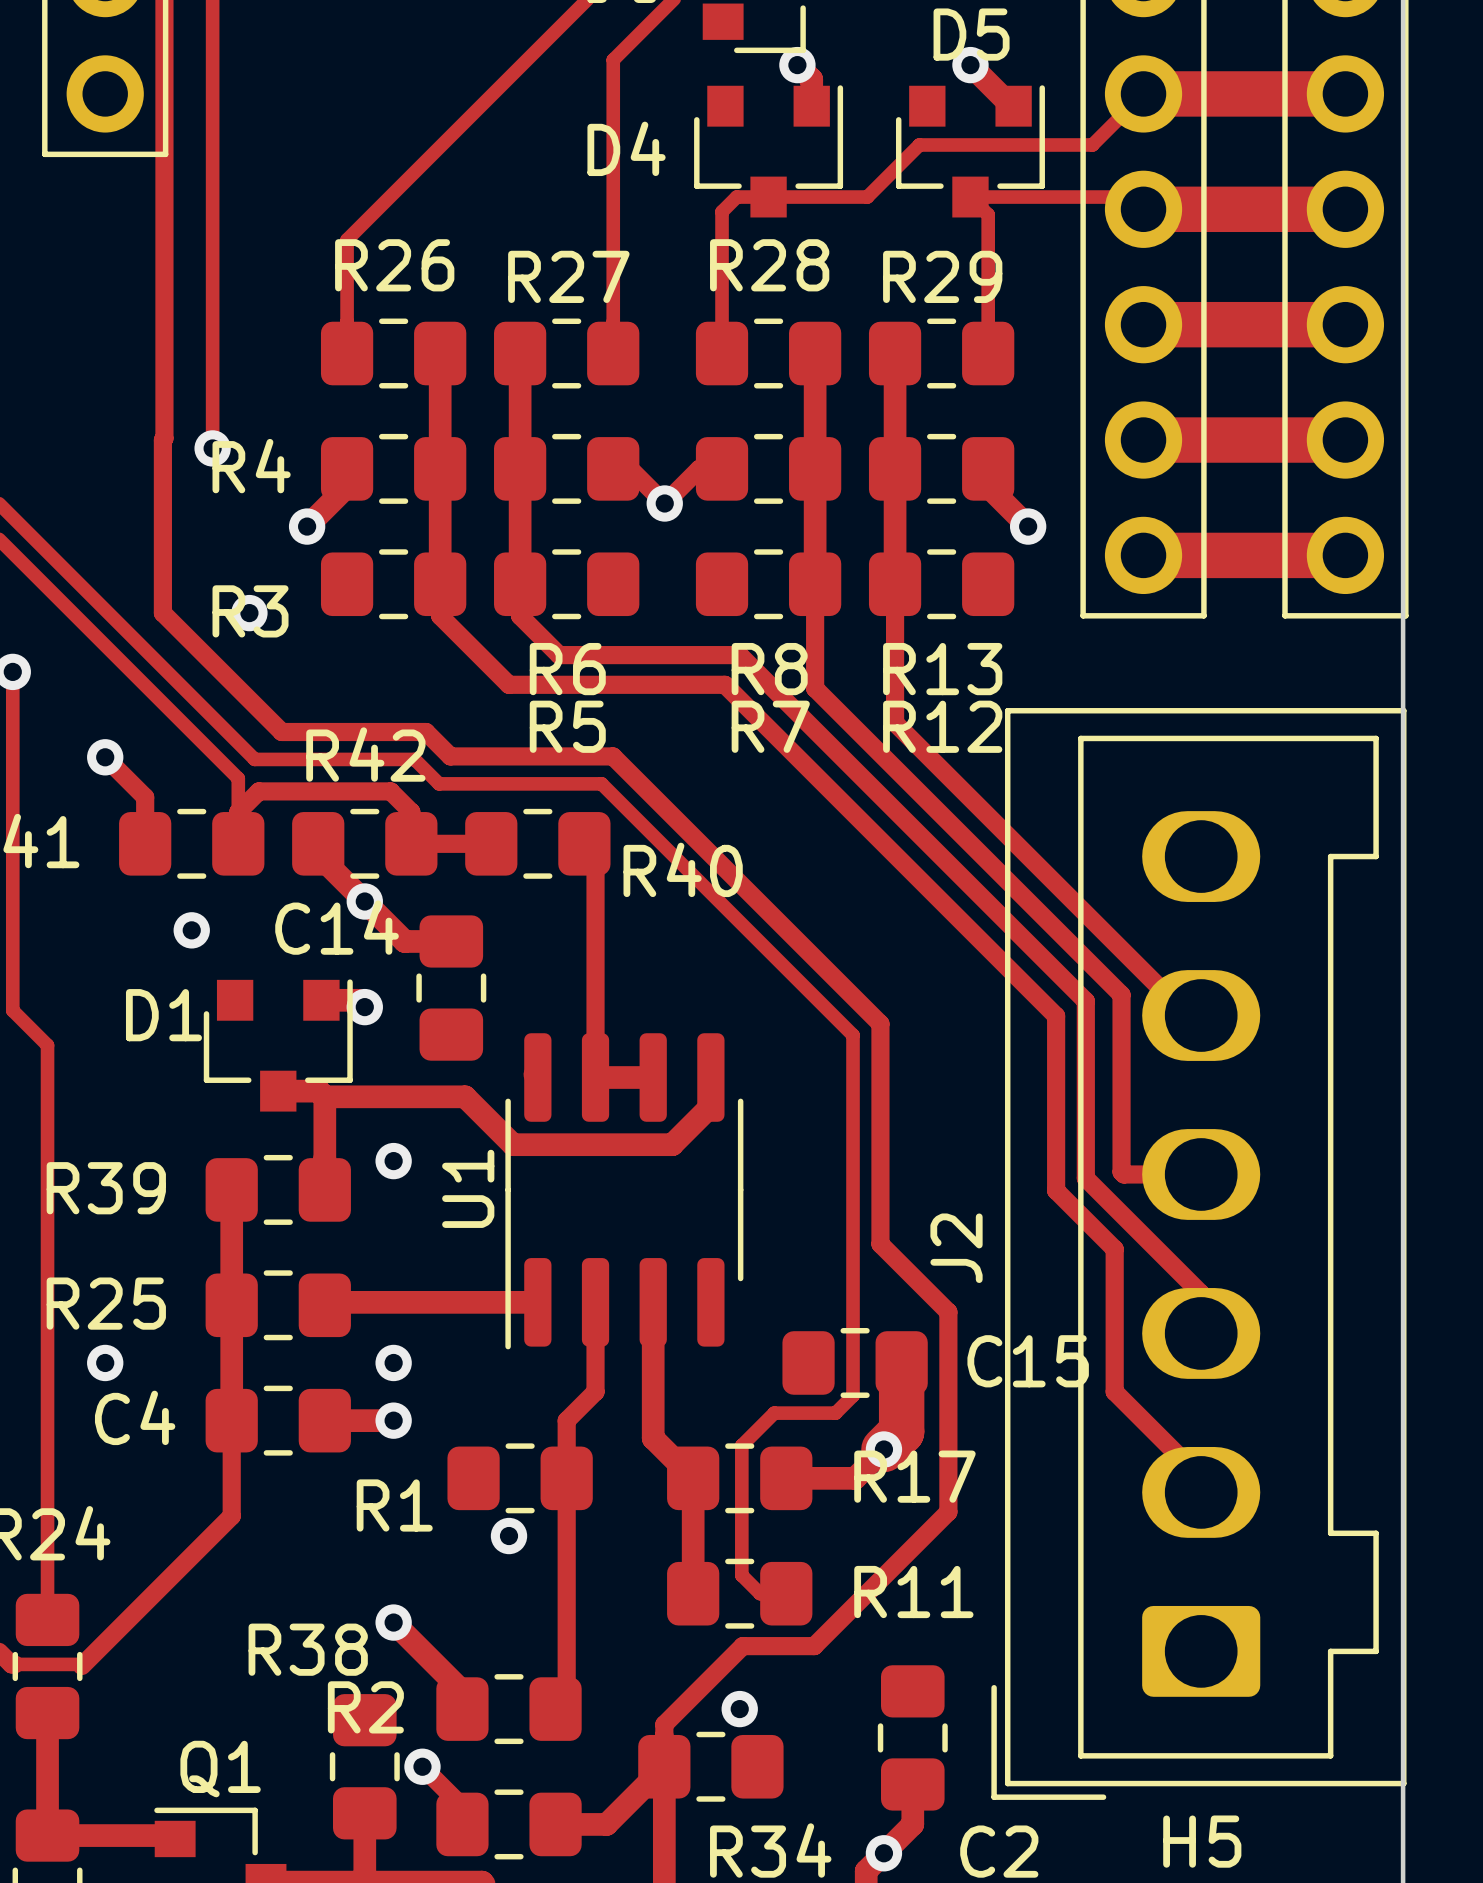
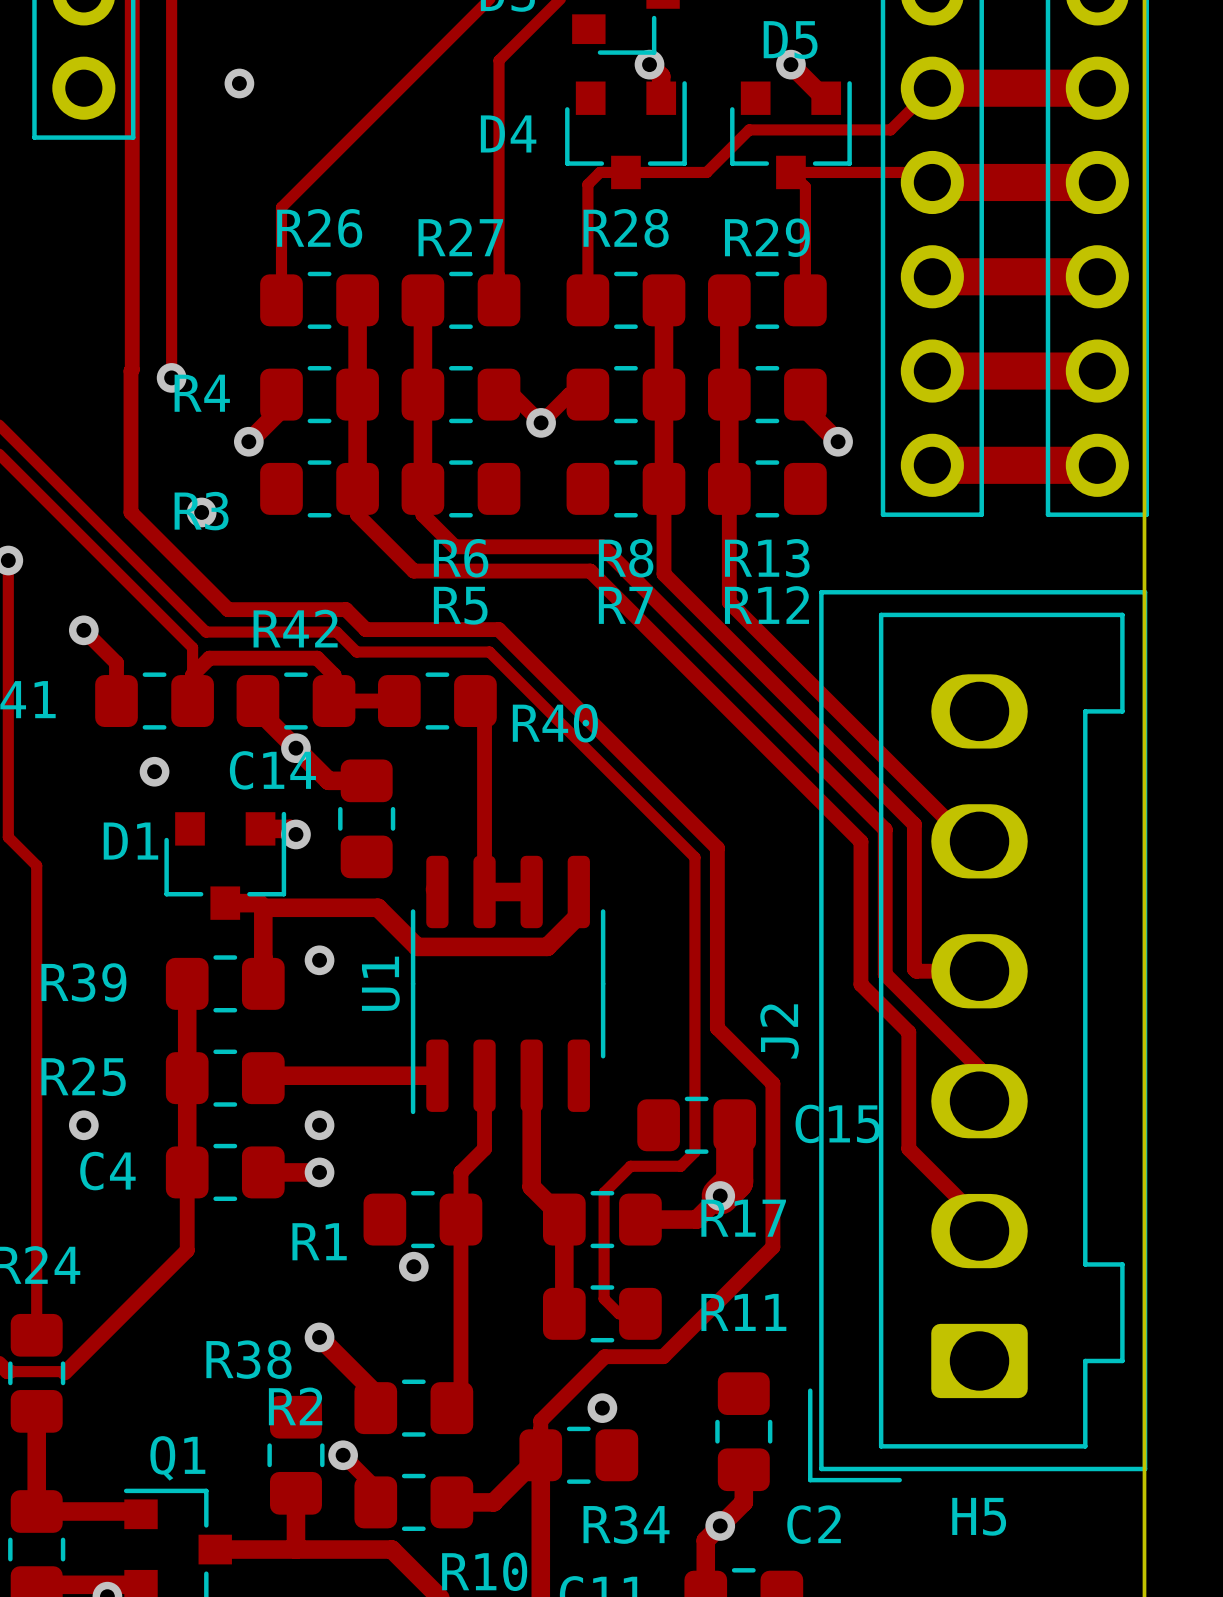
via: none -> (239, 83)

